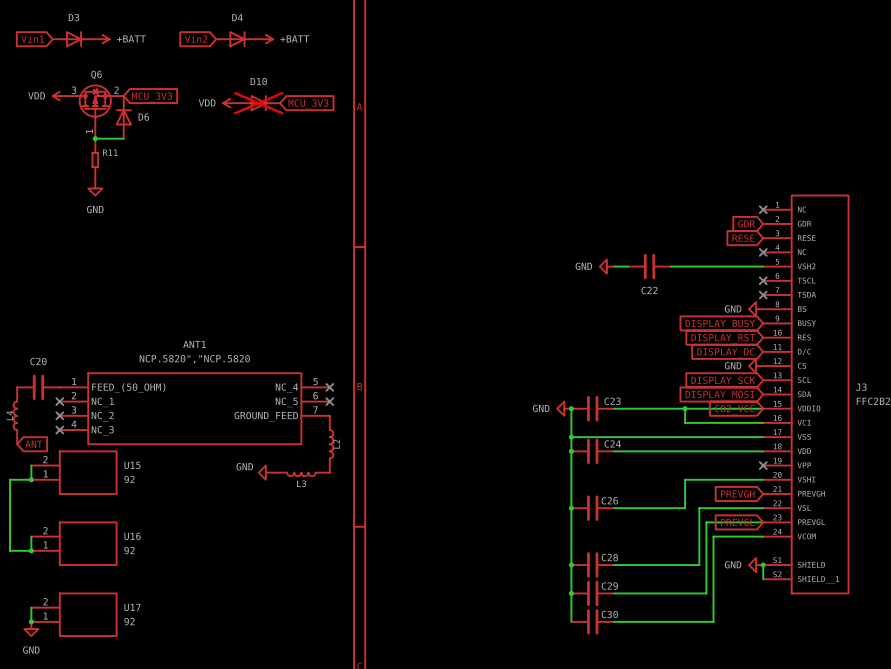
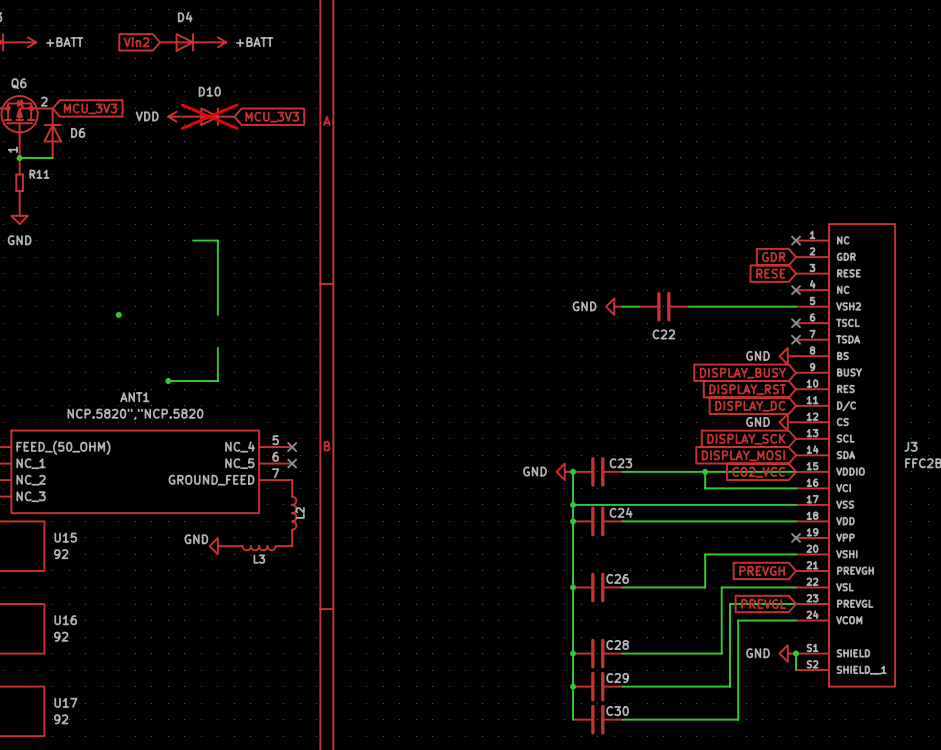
wire: none -> (193, 240) (217, 240) (217, 314)
junction: none -> (118, 314)
wire: none -> (217, 347) (217, 380) (168, 380)
junction: none -> (168, 380)

